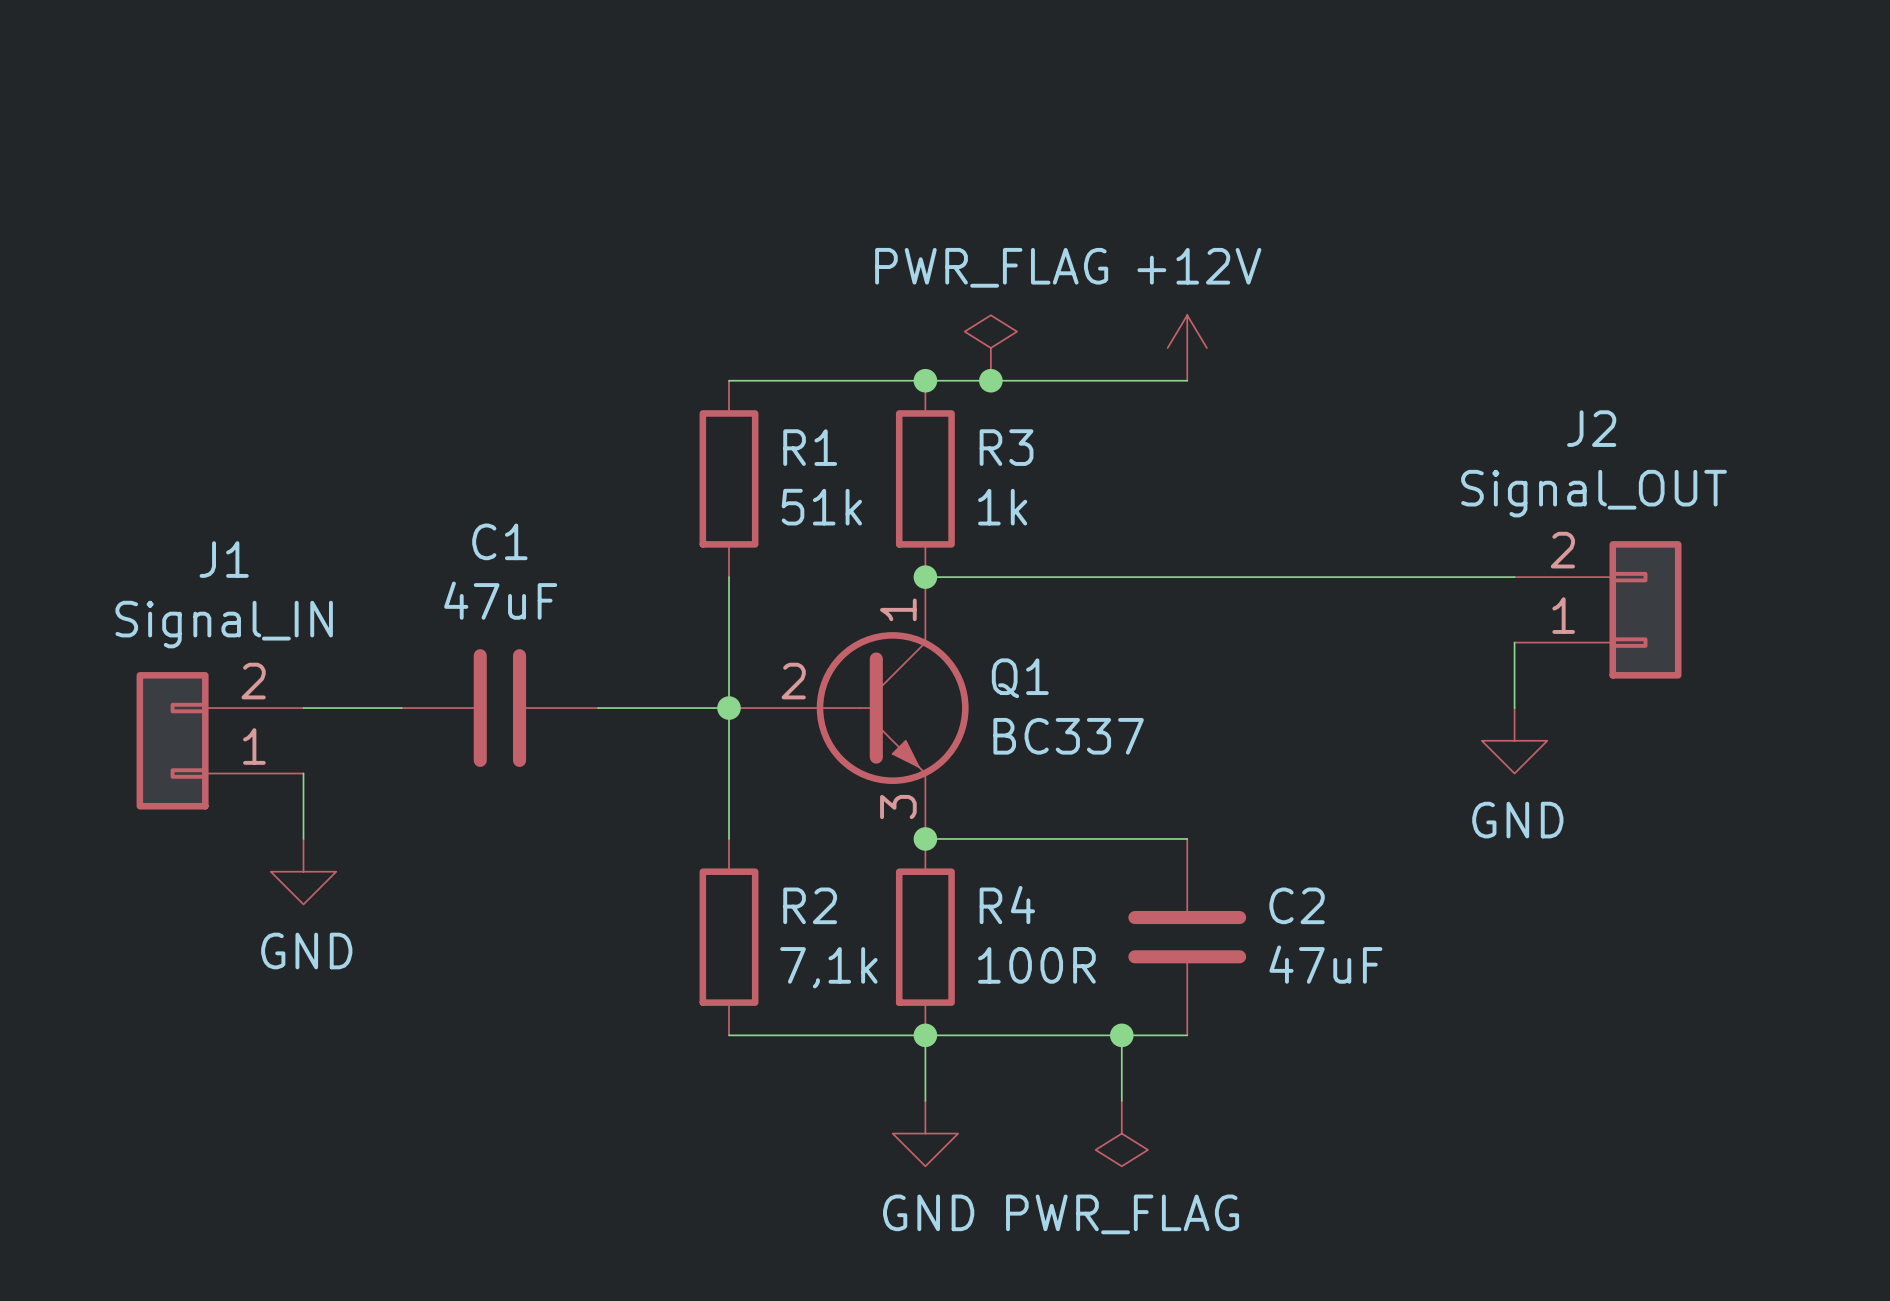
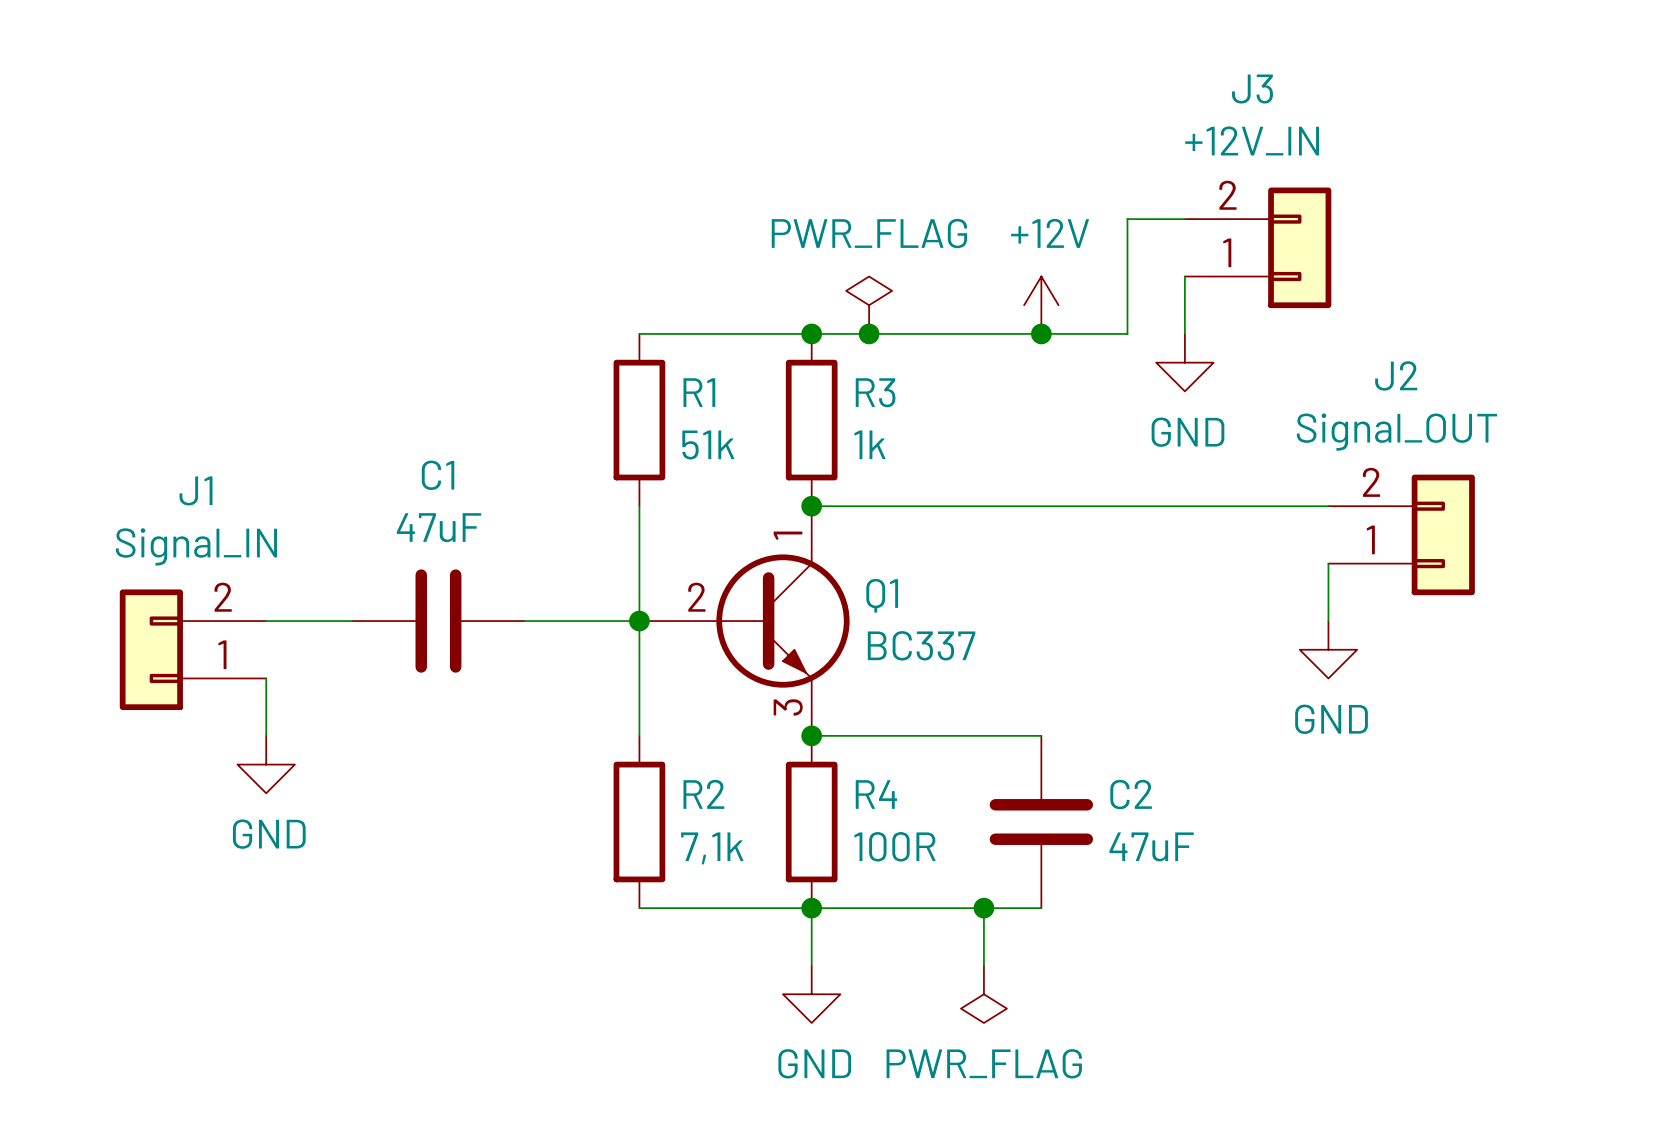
wire: none -> (1184, 219) (1127, 219) (1127, 333) (1041, 333)
J3: none -> +12V_IN (1258, 247)
wire: none -> (1184, 276) (1184, 333)
junction: none -> (1041, 333)
power symbol: none -> GND (1184, 362)

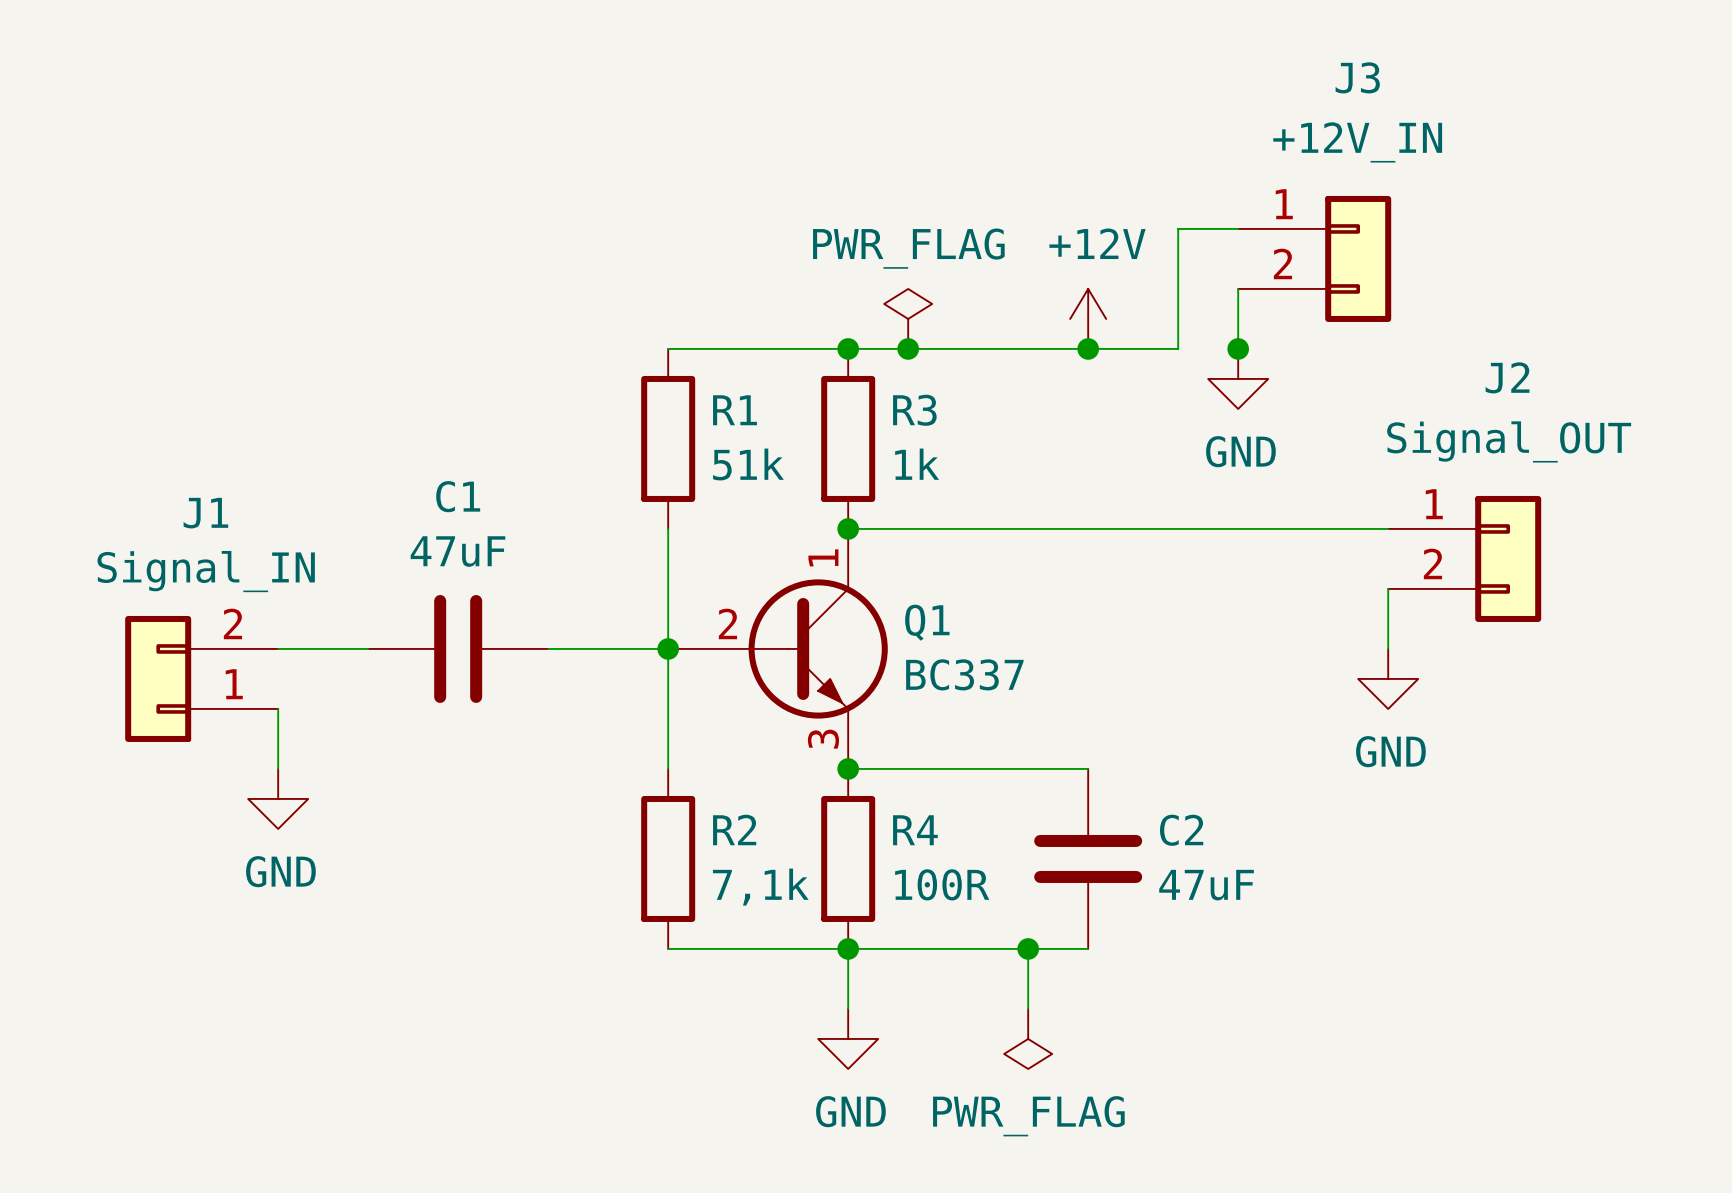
J3 name position: J3 (1252, 89) -> J3 (1357, 77)
J3 value position: +12V_IN (1252, 140) -> +12V_IN (1357, 142)
J3 flip: as is (1299, 247) -> up-down (1358, 258)
junction: none -> (1238, 348)
J2 name position: J2 (1396, 375) -> J2 (1507, 377)
J2 value position: Signal_OUT (1396, 432) -> Signal_OUT (1509, 441)
J2 flip: as is (1443, 534) -> up-down (1508, 558)

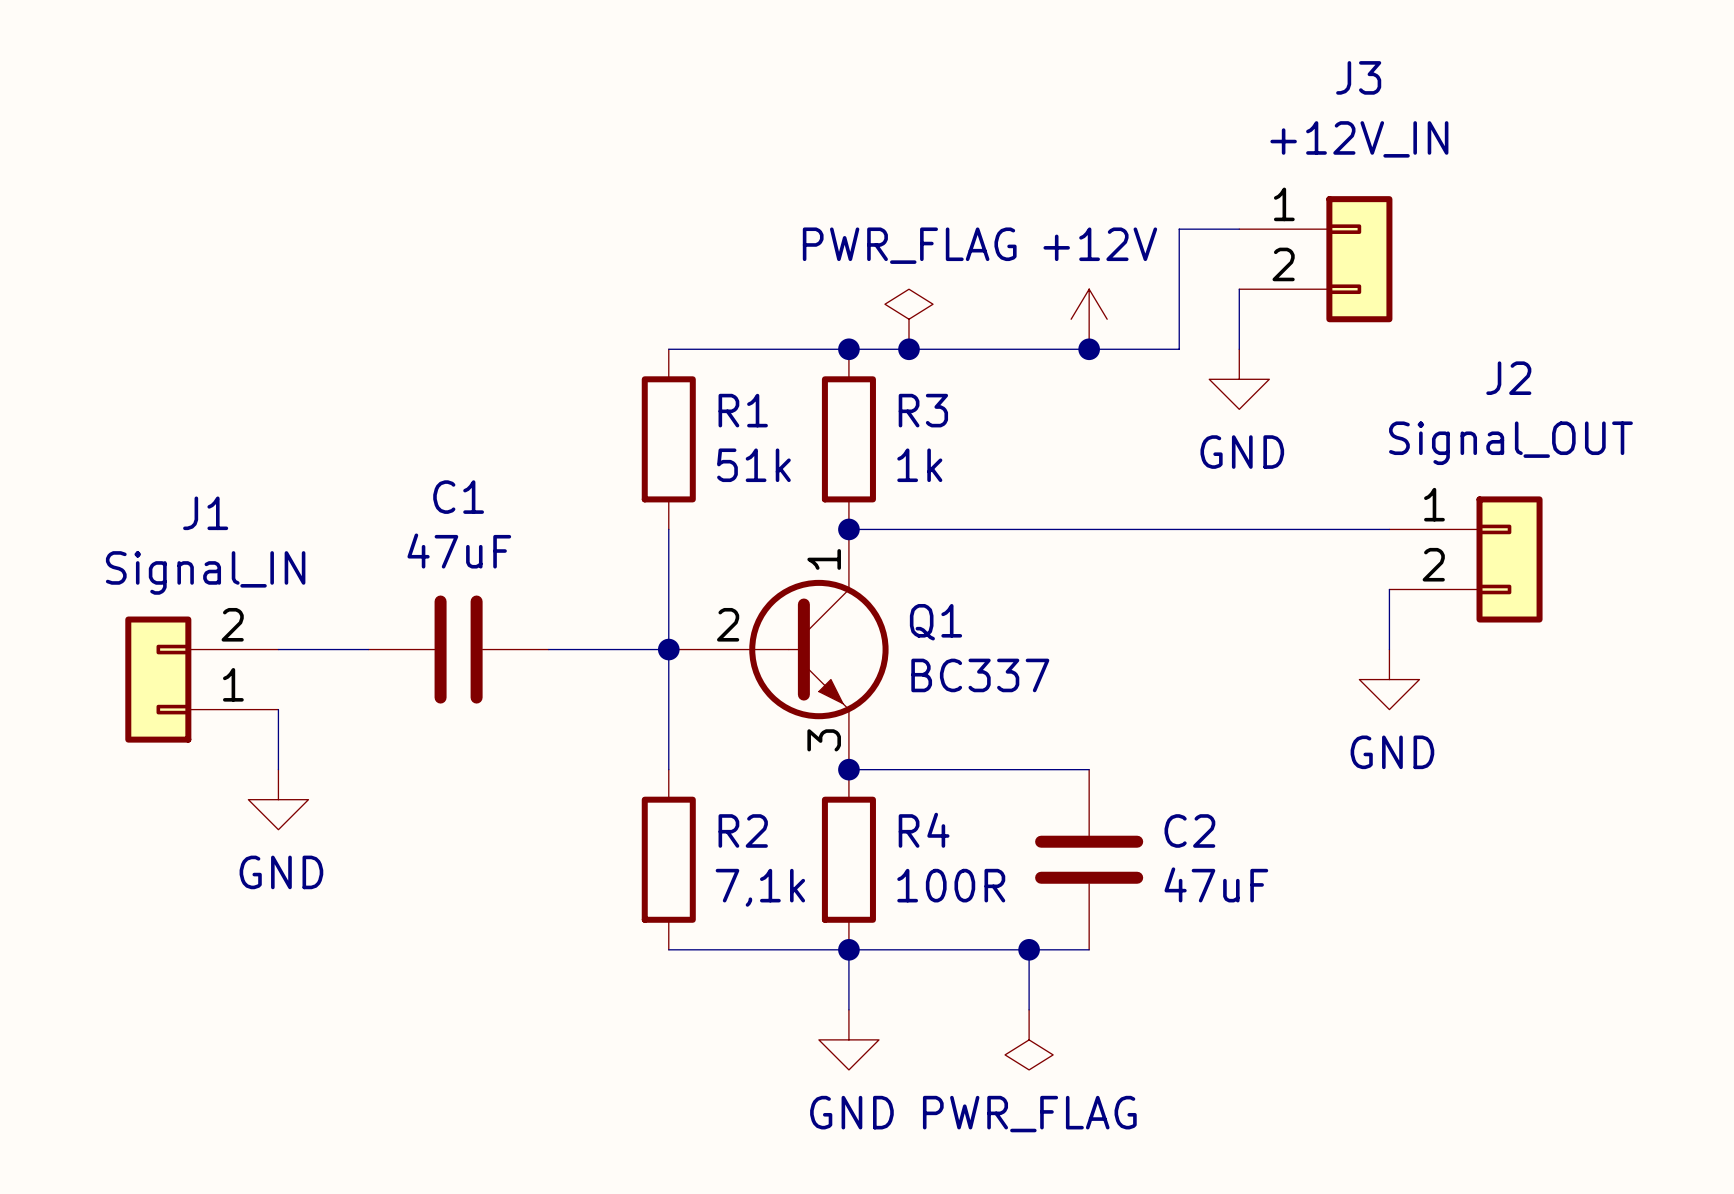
junction: (1238, 348) -> none

